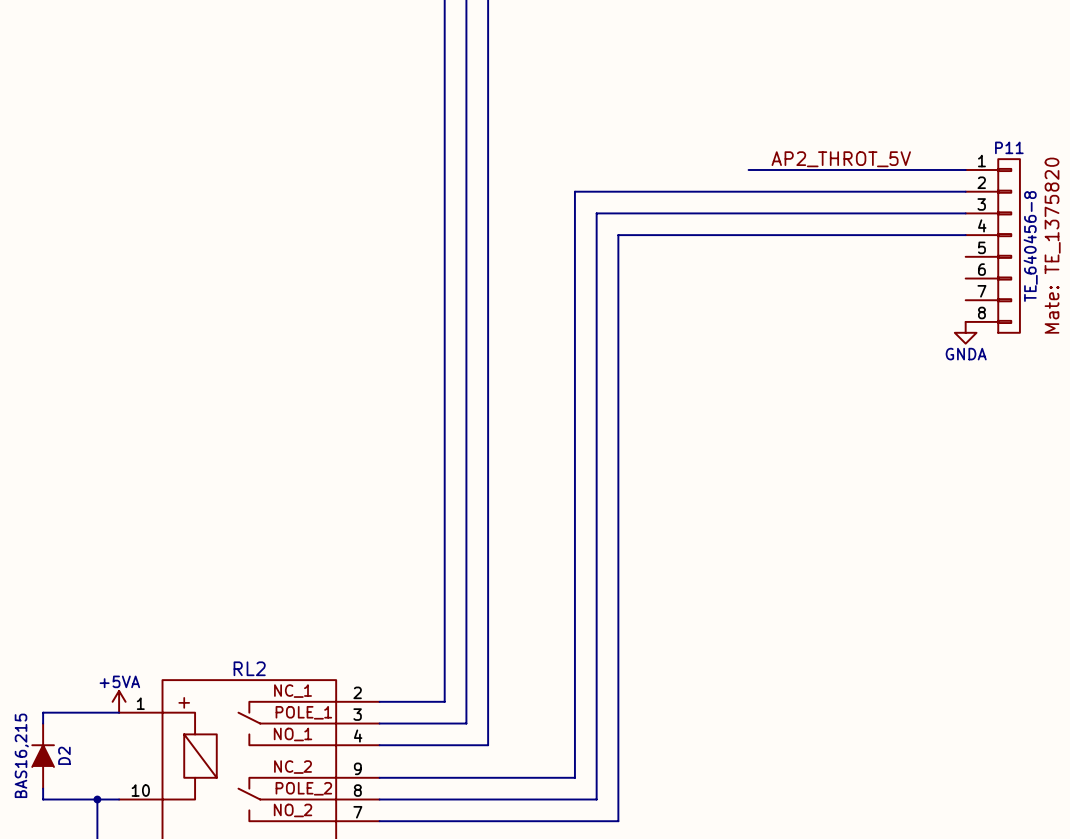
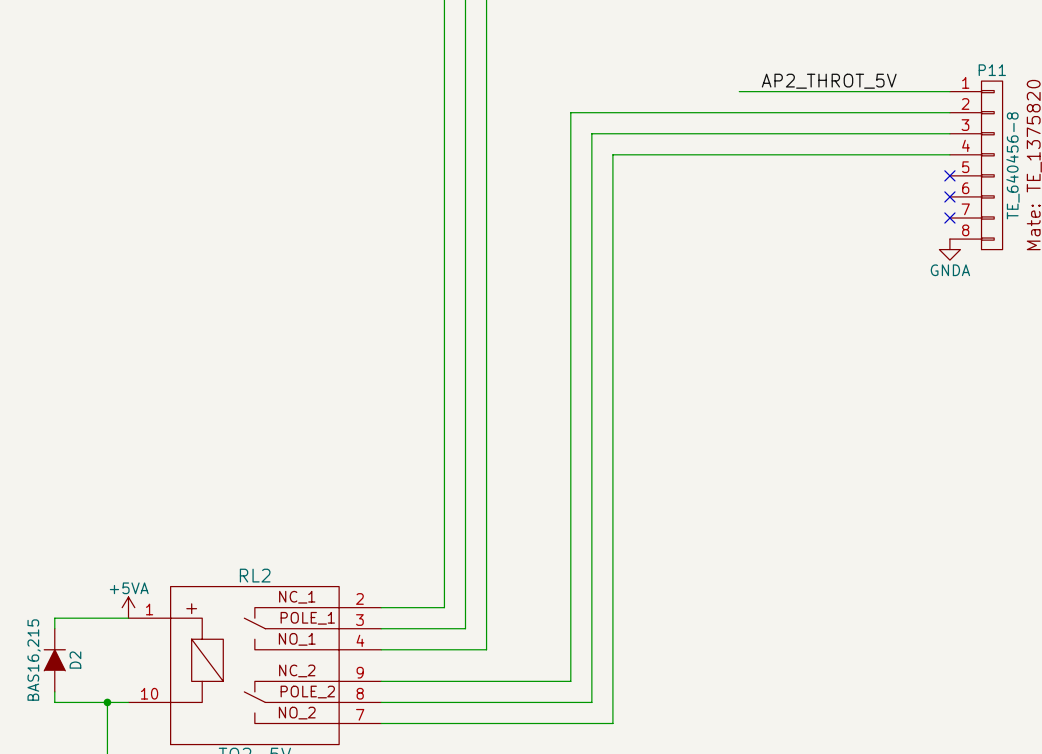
no-connect mark: none -> (949, 175)
no-connect mark: none -> (949, 196)
no-connect mark: none -> (949, 218)

